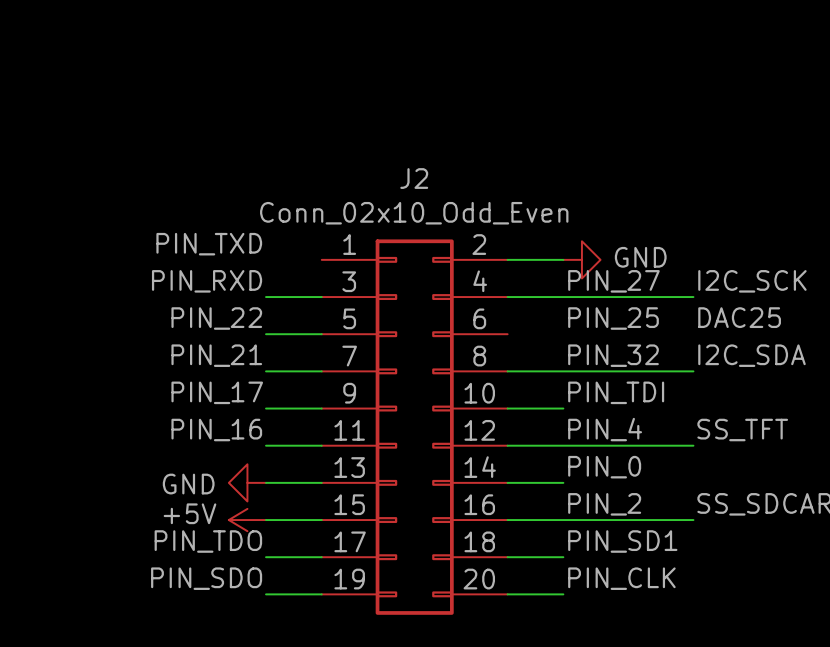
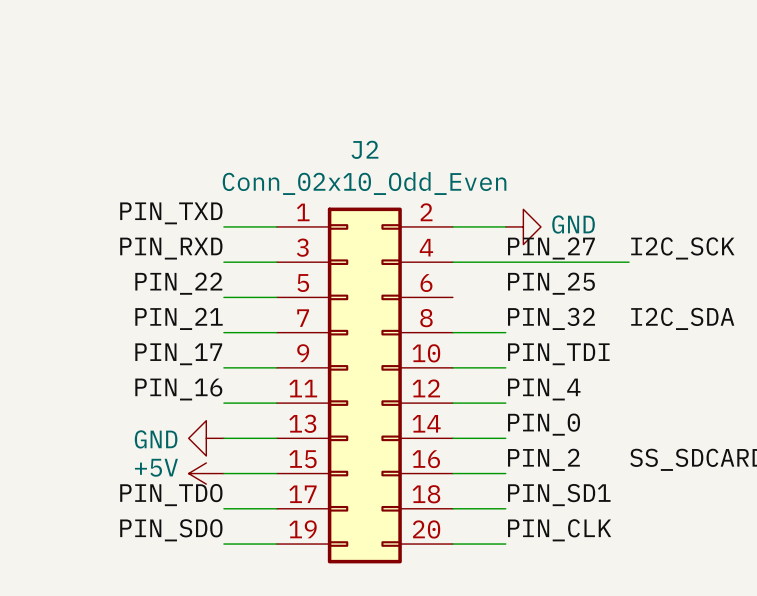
wire: none -> (223, 226) (276, 226)
label: DAC25 (739, 317) -> none
wire: (563, 371) (693, 371) -> none
label: SS_TFT (742, 430) -> none
wire: (563, 445) (693, 445) -> none
wire: (563, 520) (693, 520) -> none

